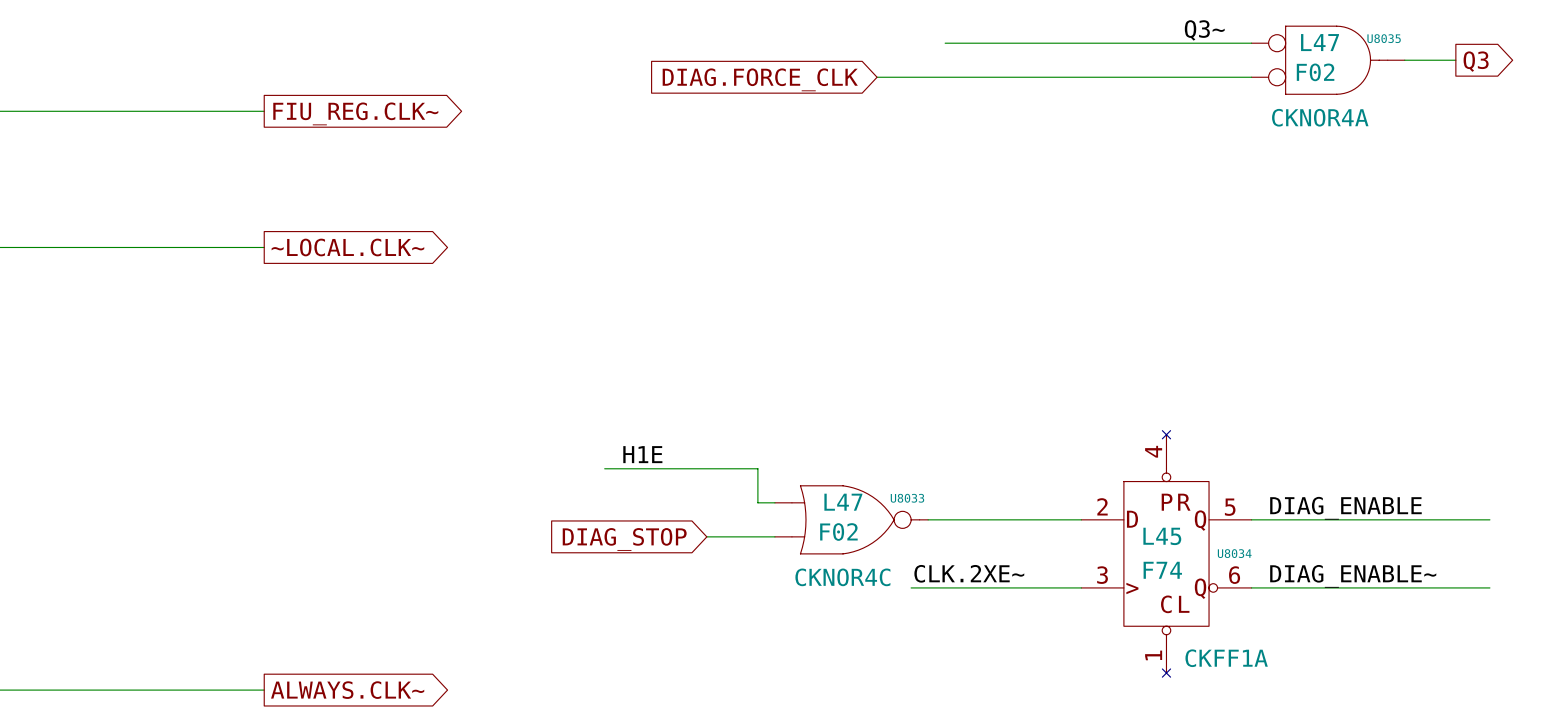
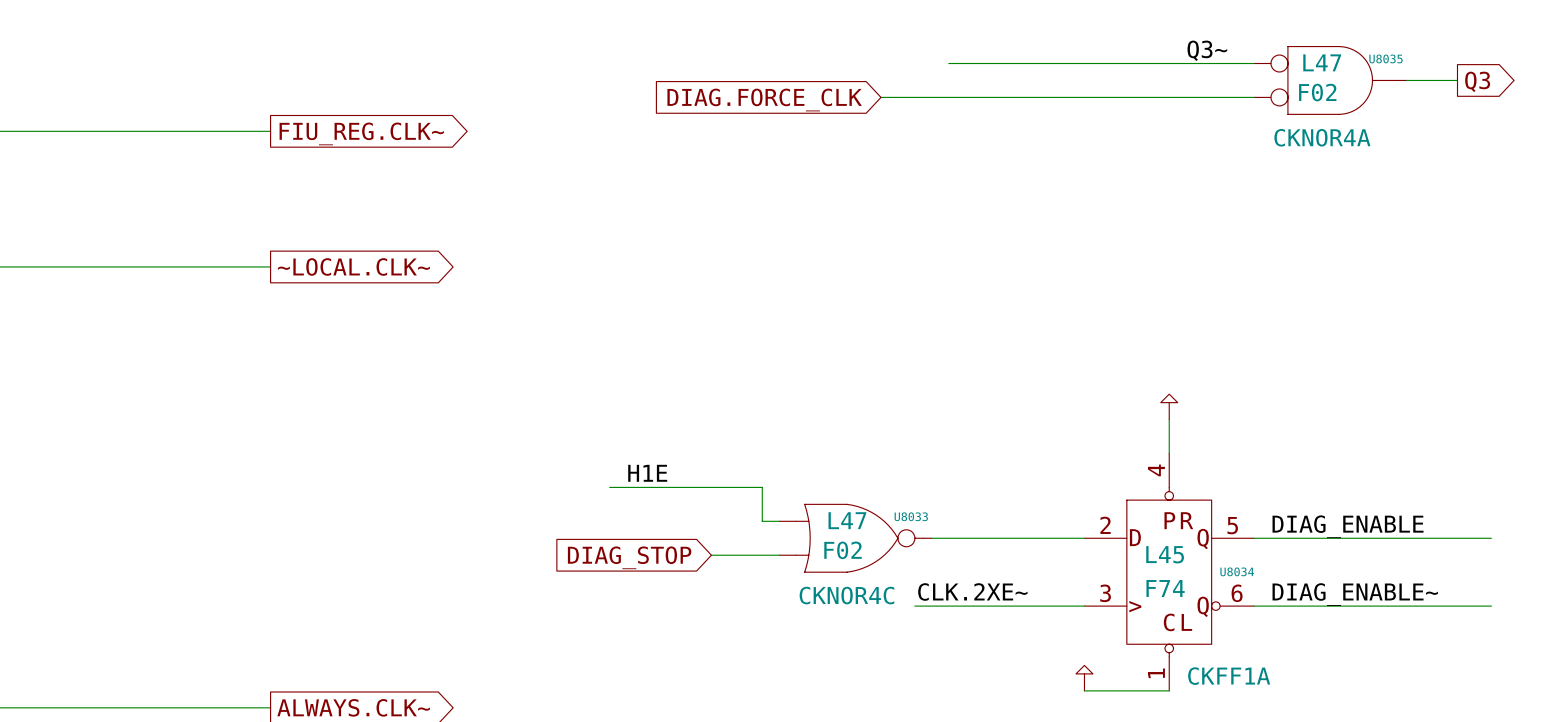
power symbol: none -> (1169, 406)
wire: none -> (1169, 419) (1169, 453)
no-connect mark: (1166, 434) -> none
power symbol: none -> (1084, 677)
wire: none -> (1084, 690) (1169, 690)
no-connect mark: (1166, 673) -> none

